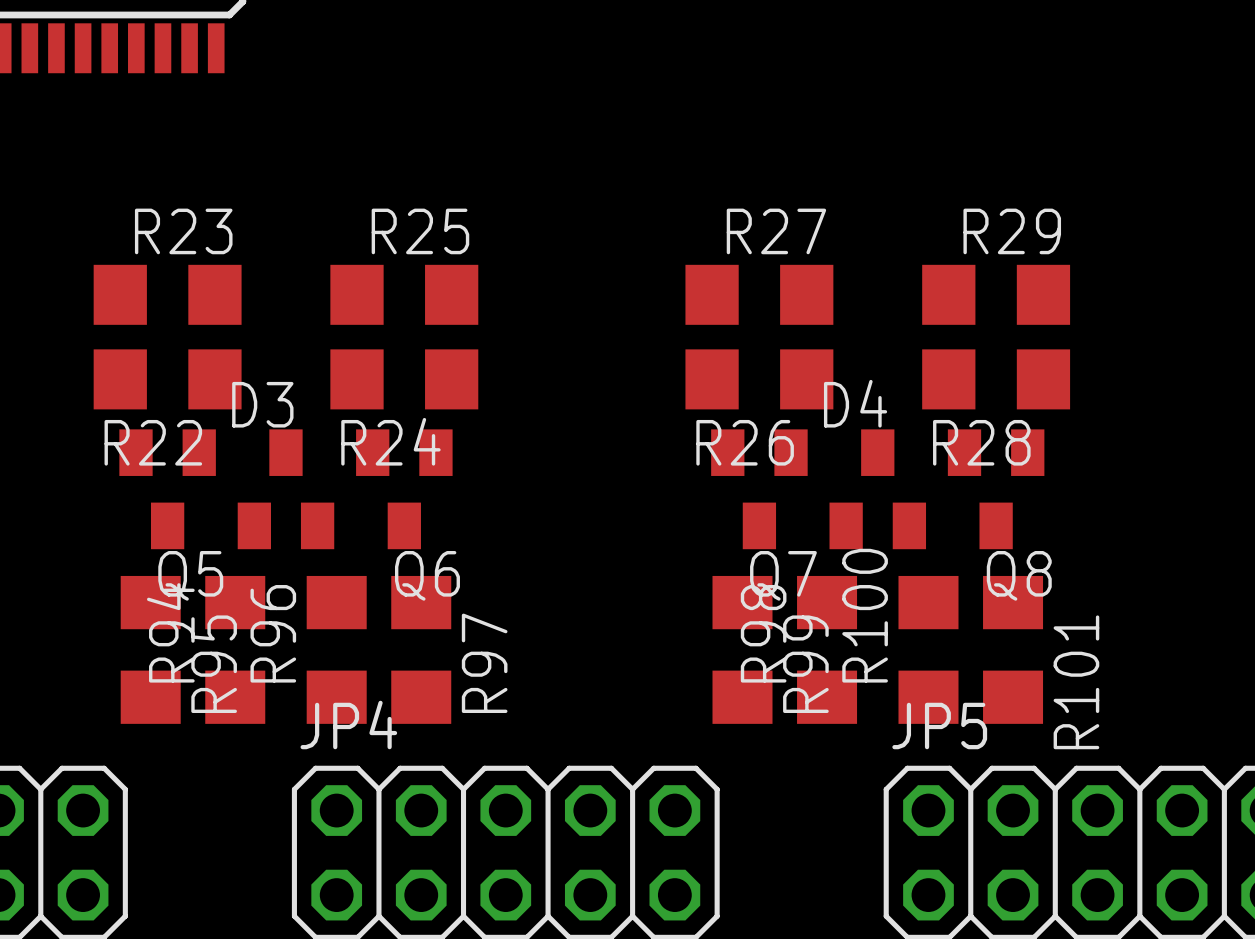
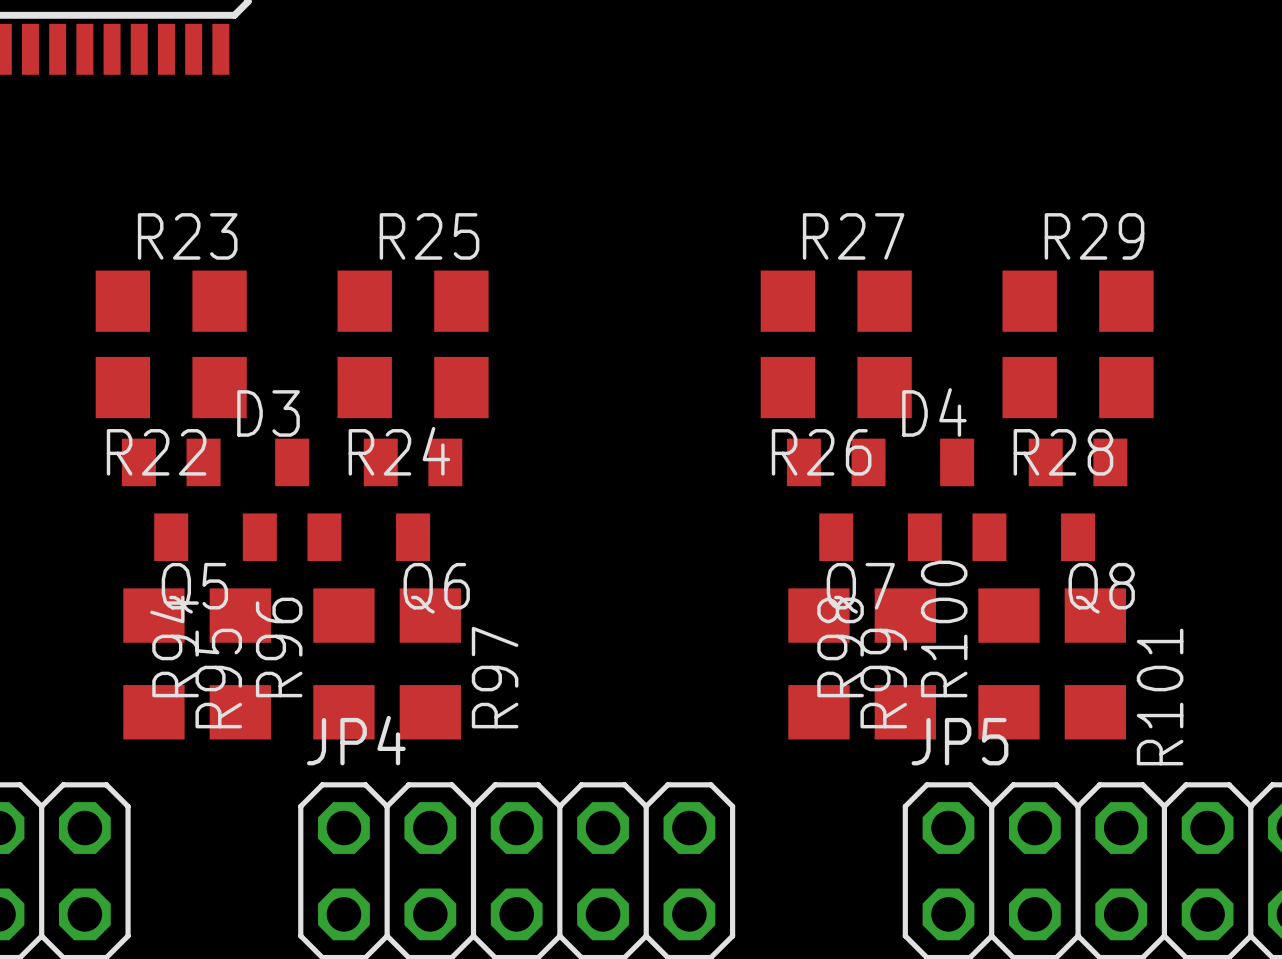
R27 position: (759, 294) -> (836, 301)
R29 position: (996, 294) -> (1078, 301)
R26 position: (759, 379) -> (836, 387)
R28 position: (996, 379) -> (1078, 387)
Q7 position: (759, 489) -> (836, 499)
D4 position: (877, 489) -> (957, 499)
Q8 position: (996, 489) -> (1078, 499)
R99 position: (742, 649) -> (818, 663)
R98 position: (827, 649) -> (905, 663)
R100 position: (928, 649) -> (1008, 663)
R101 position: (1013, 649) -> (1095, 663)

